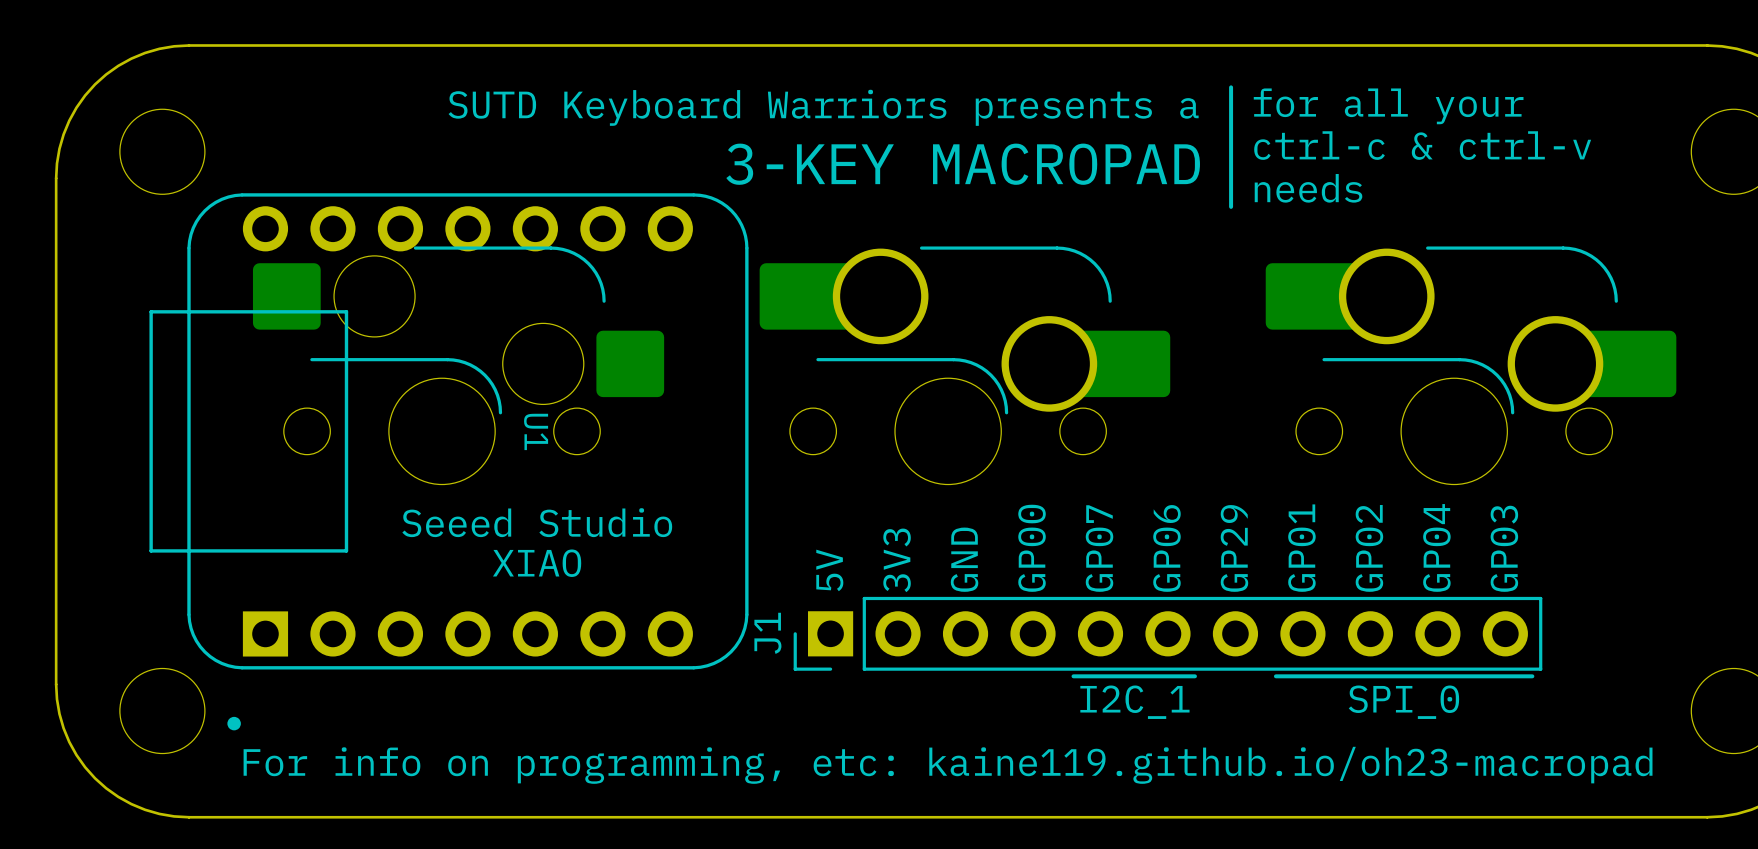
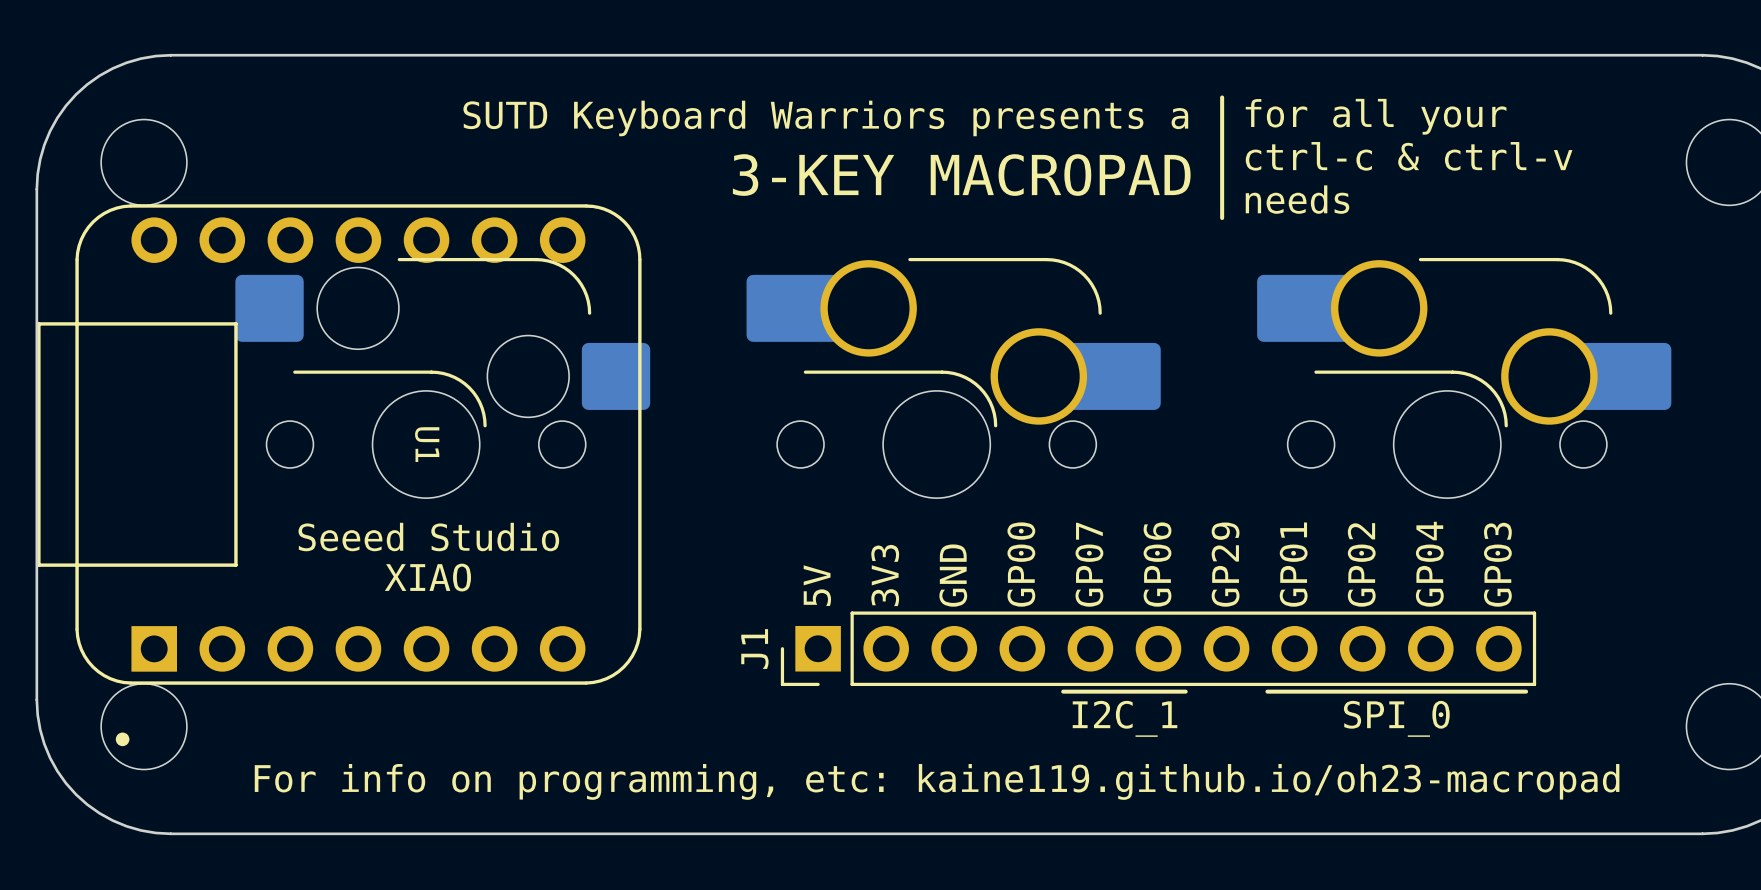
U1 position: (449, 461) -> (339, 475)

